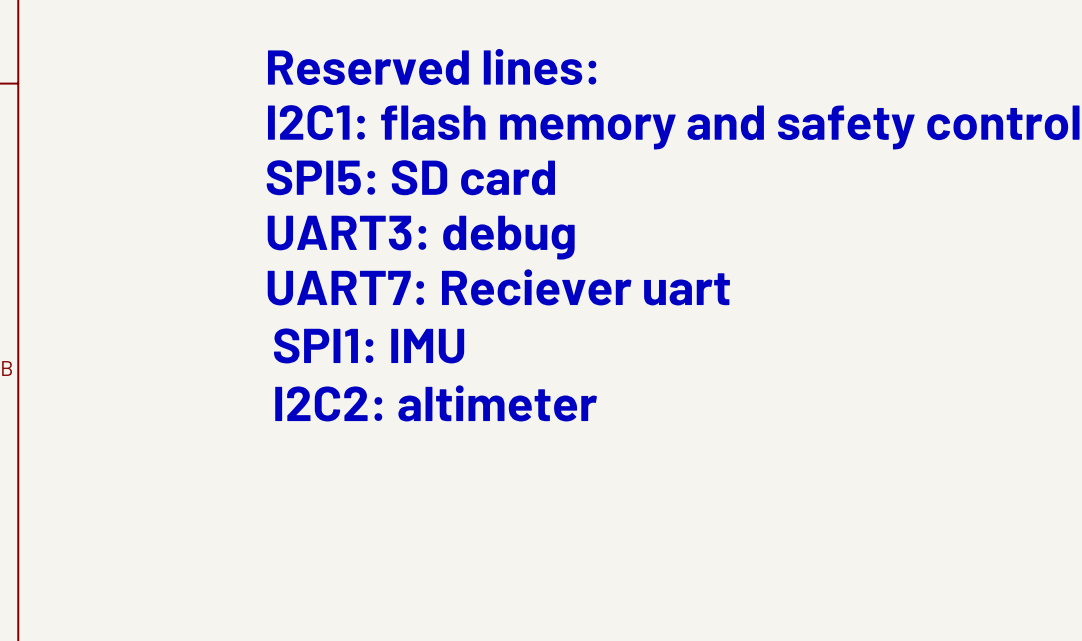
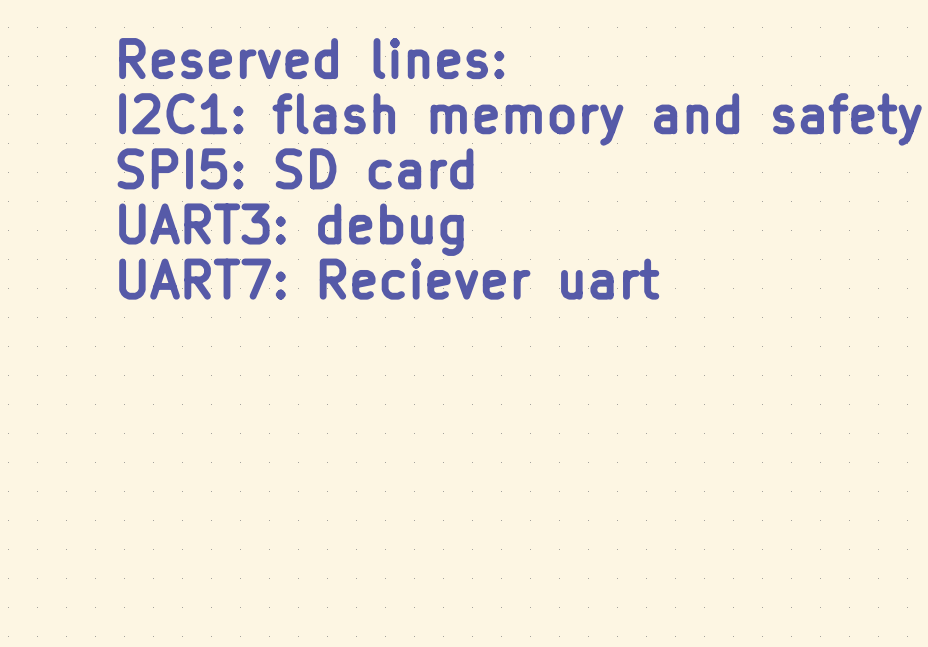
text: SPI1: IMU (369, 345) -> none
text: I2C2: altimeter (436, 403) -> none

